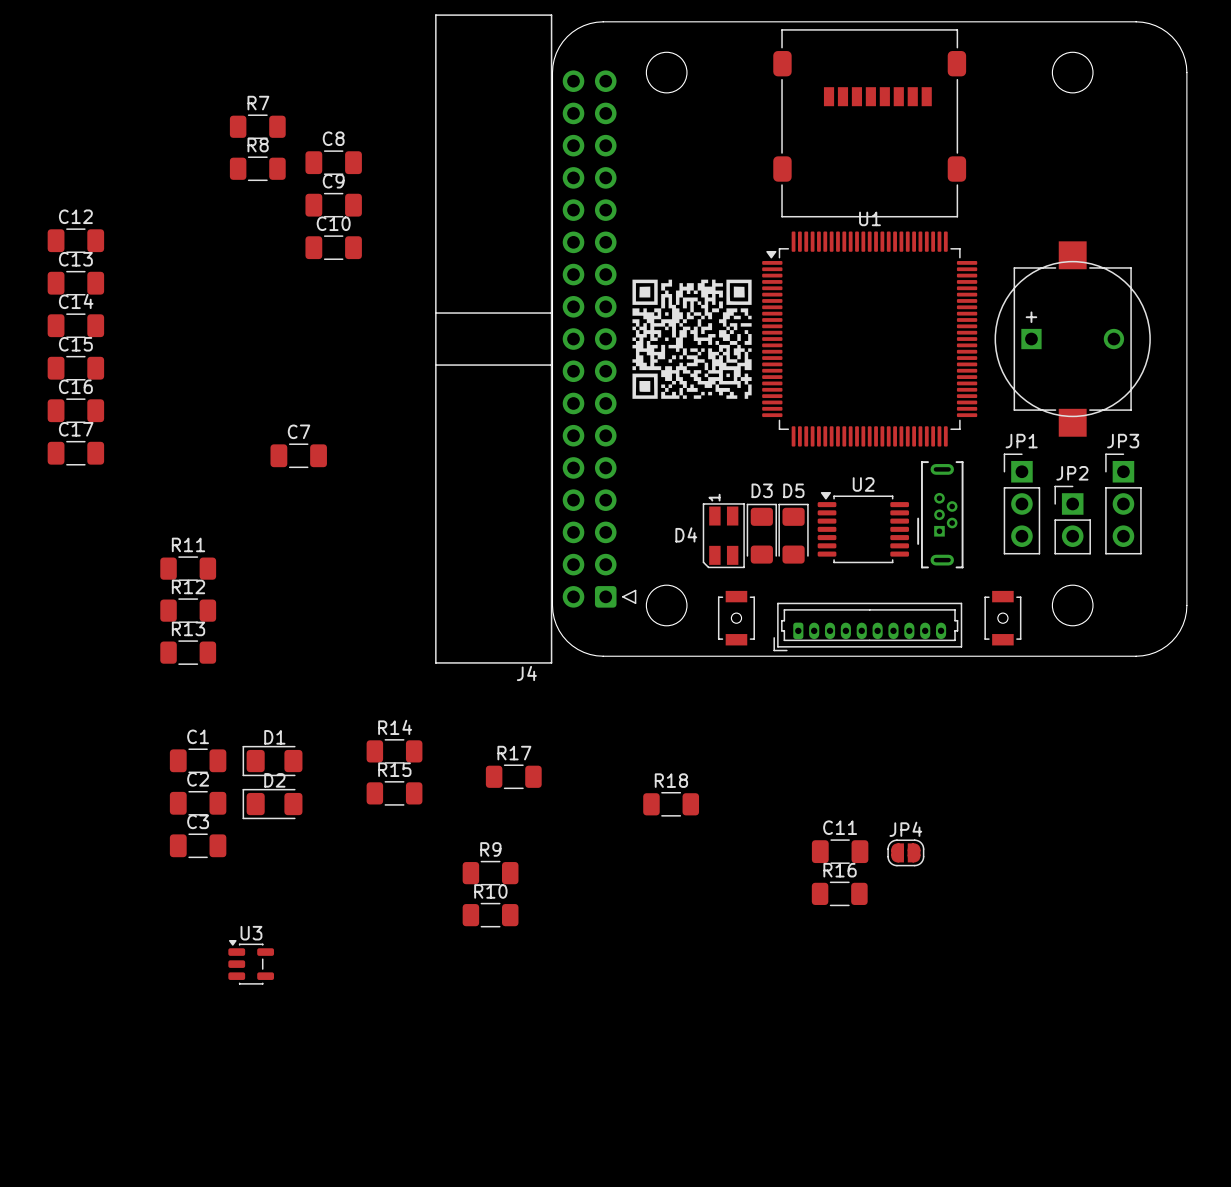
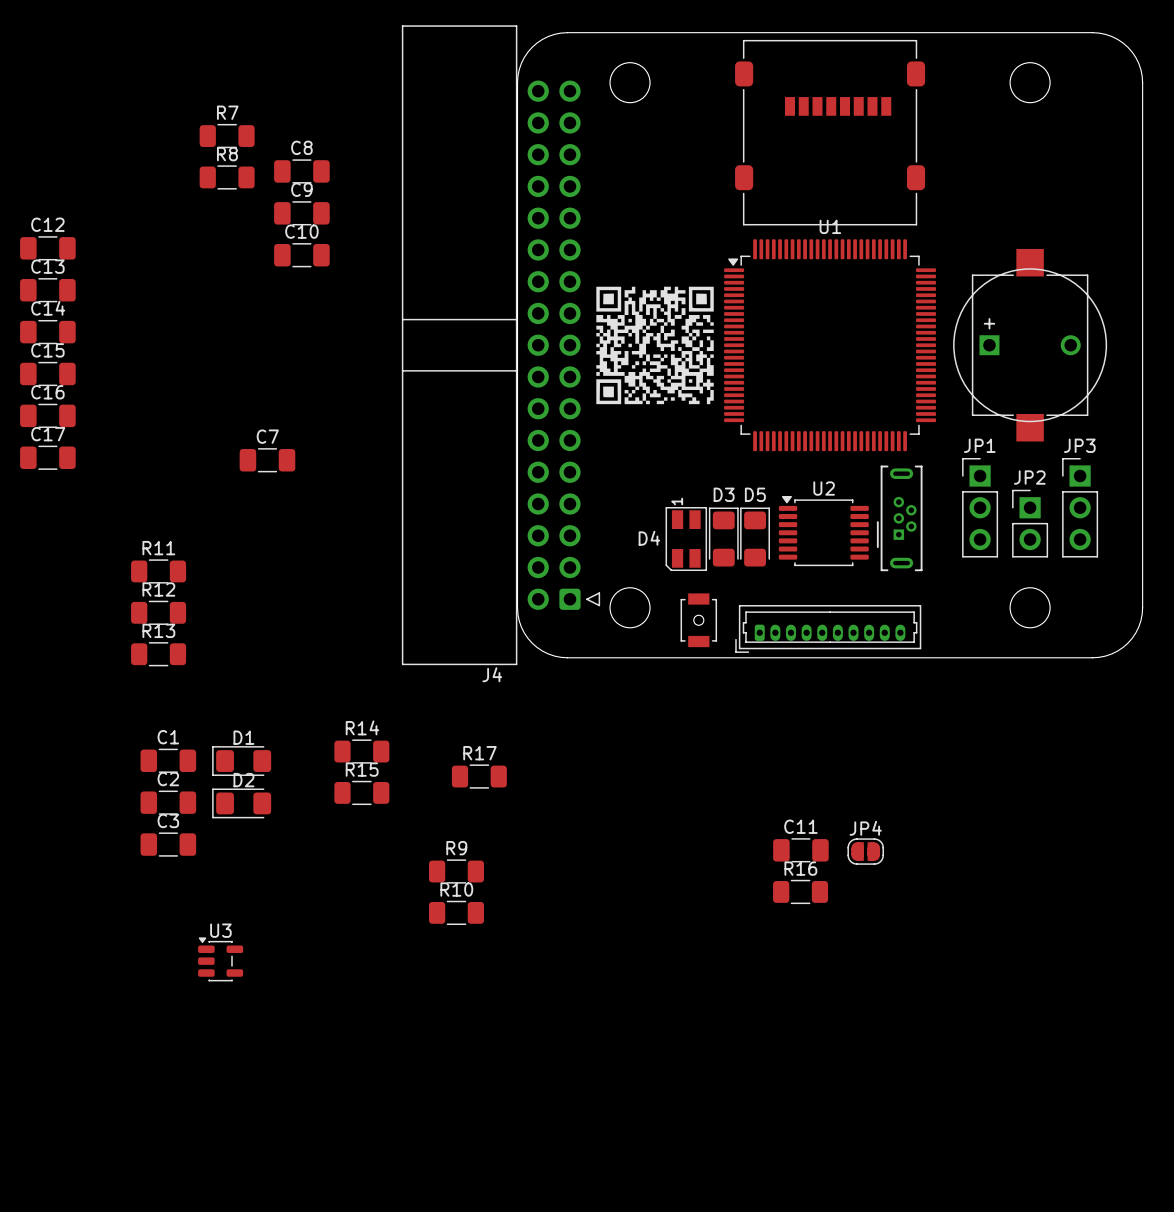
part: (1002, 618) -> none
R18: (671, 804) -> none

